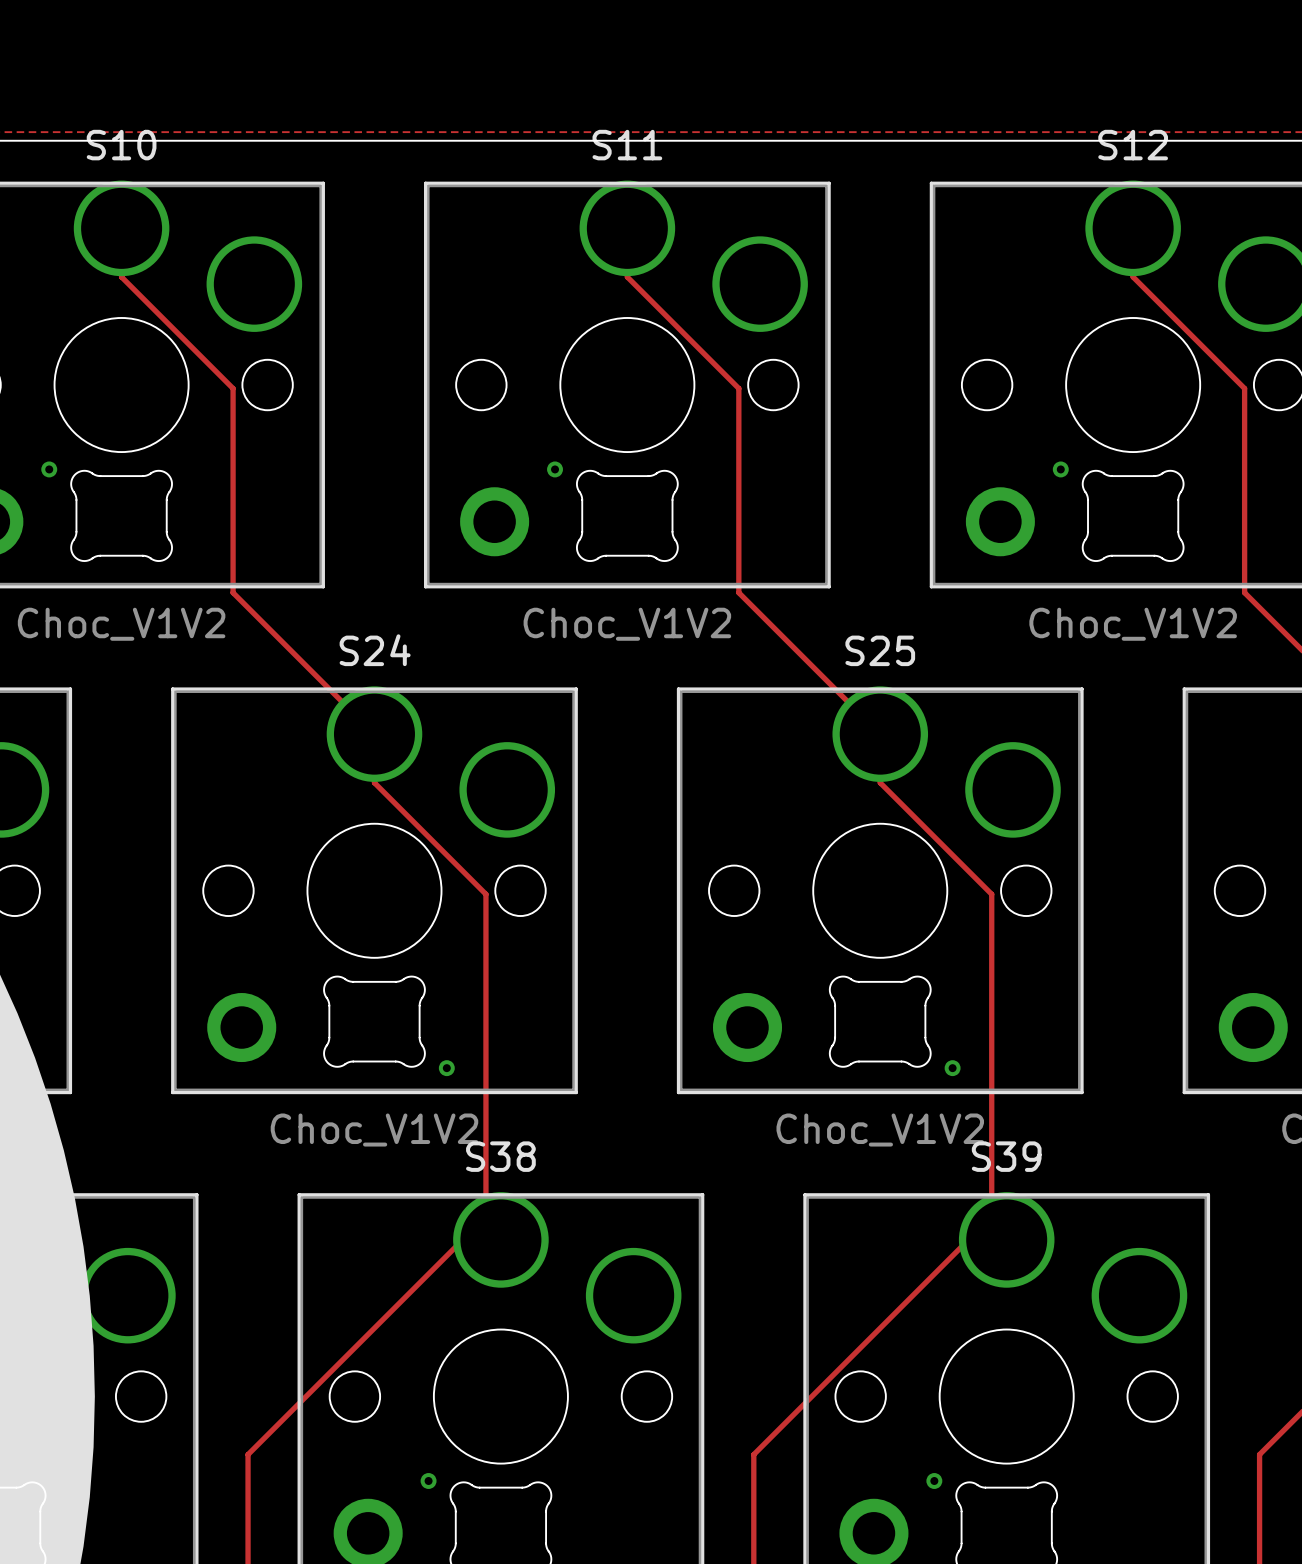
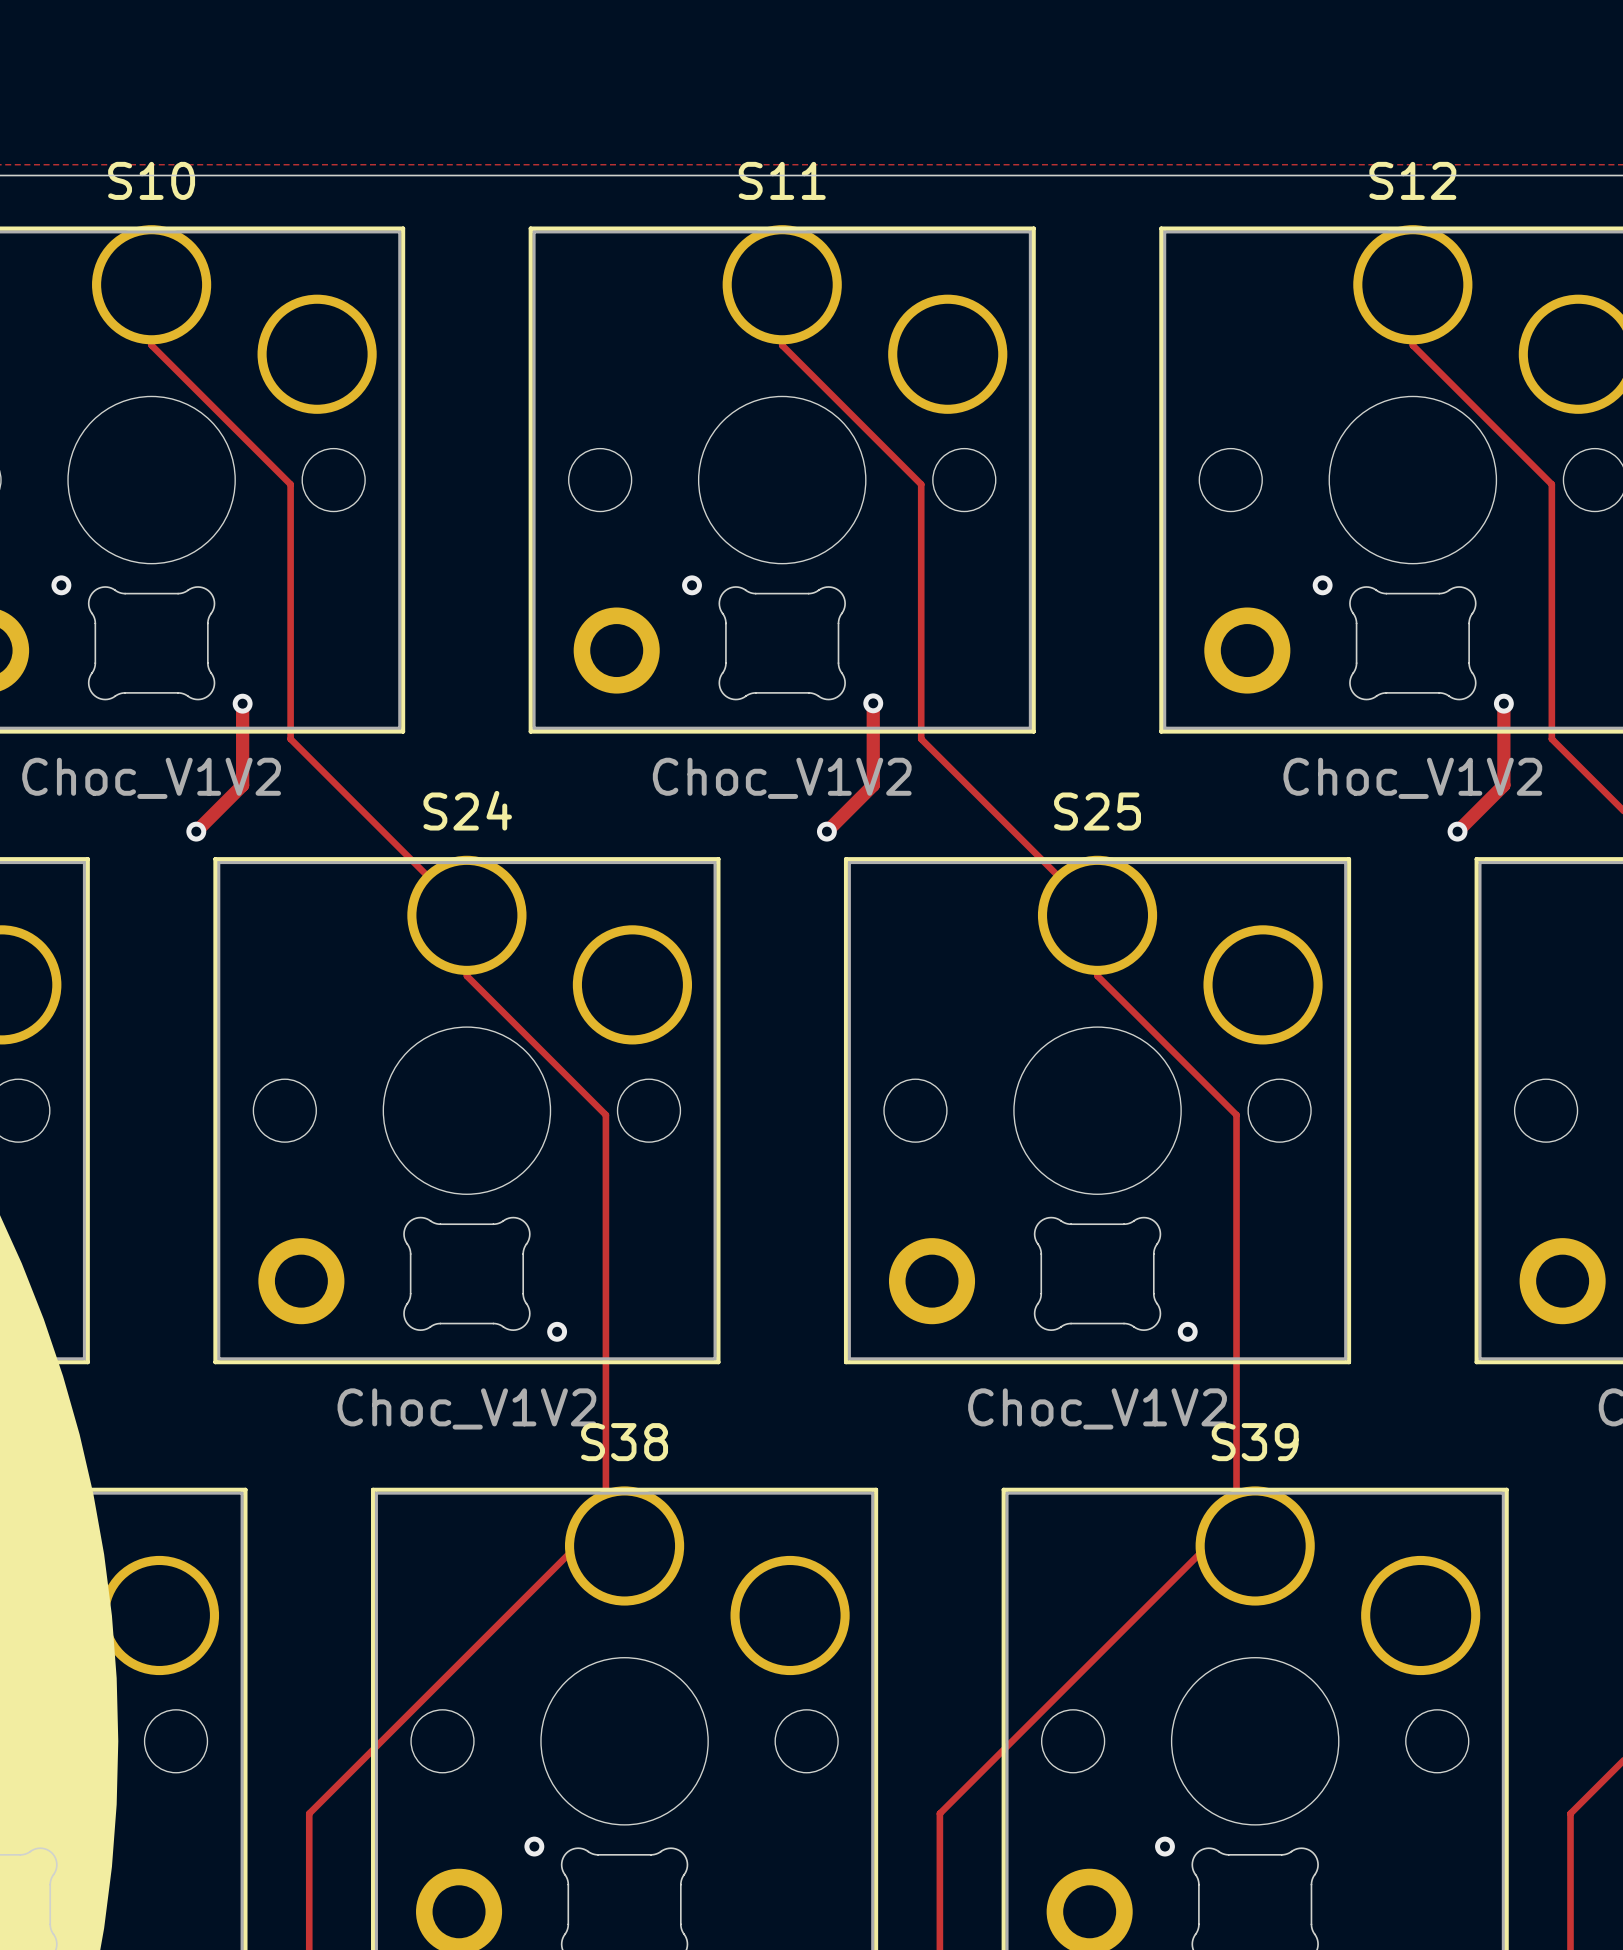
track: none -> (242, 703) (242, 785) (196, 831)
via: none -> (242, 703)
track: none -> (873, 703) (873, 785) (826, 831)
via: none -> (873, 703)
track: none -> (1503, 703) (1503, 785) (1457, 831)
via: none -> (1503, 703)
via: none -> (196, 831)
via: none -> (826, 831)
via: none -> (1457, 831)

